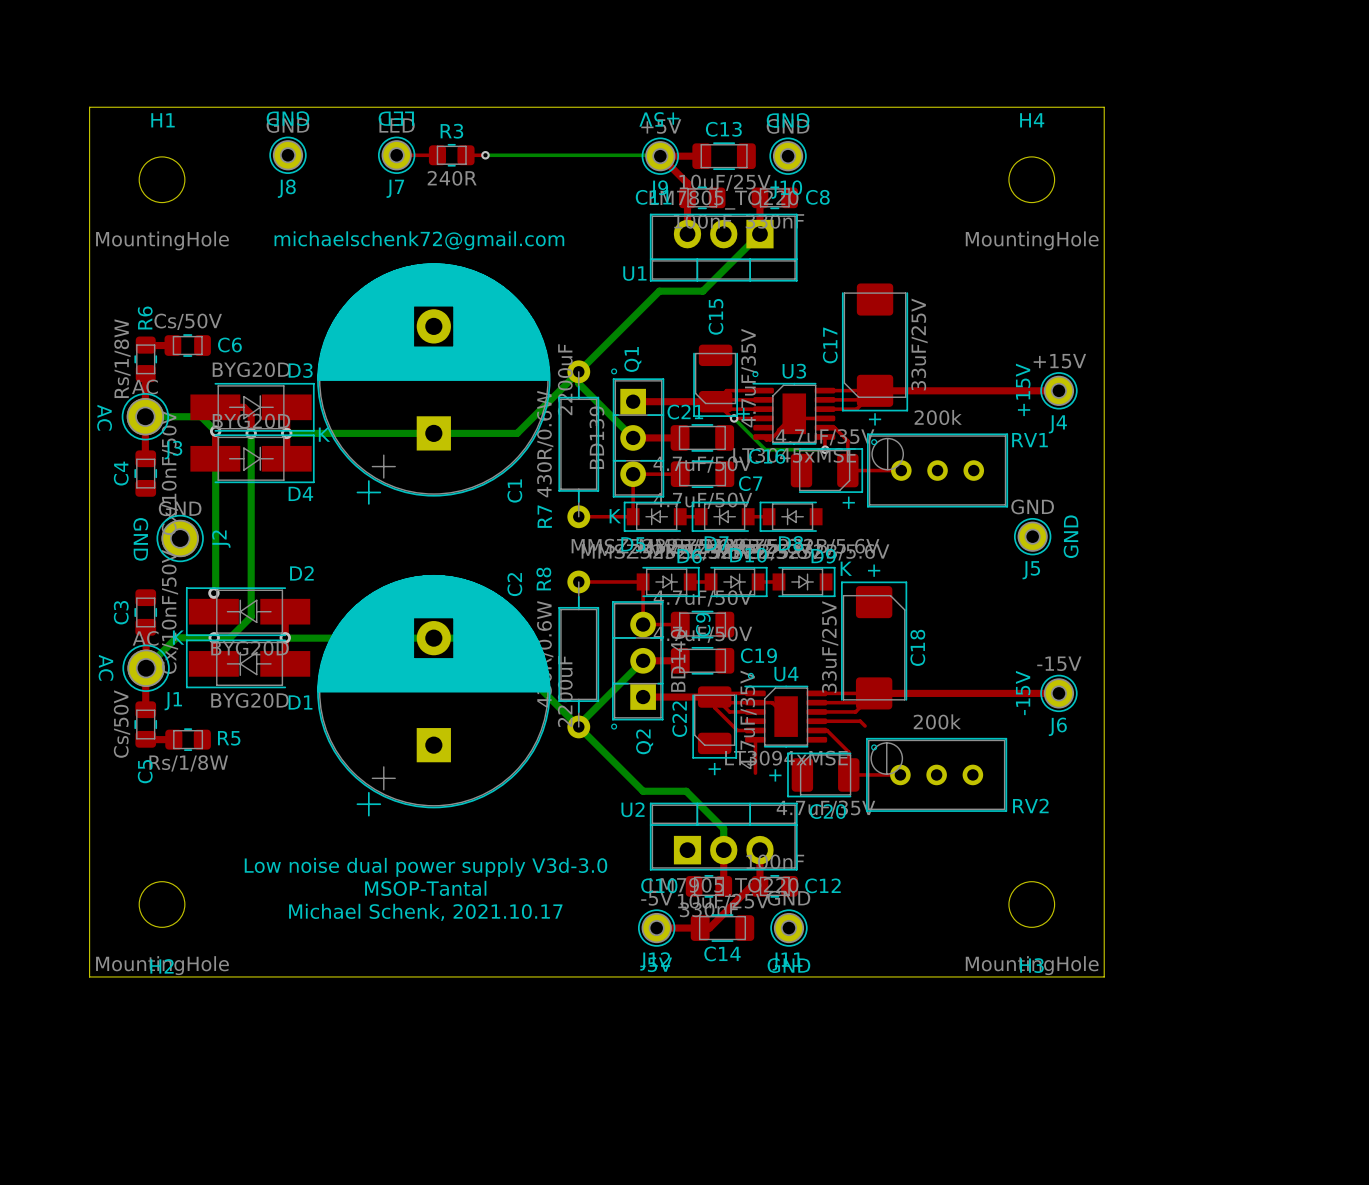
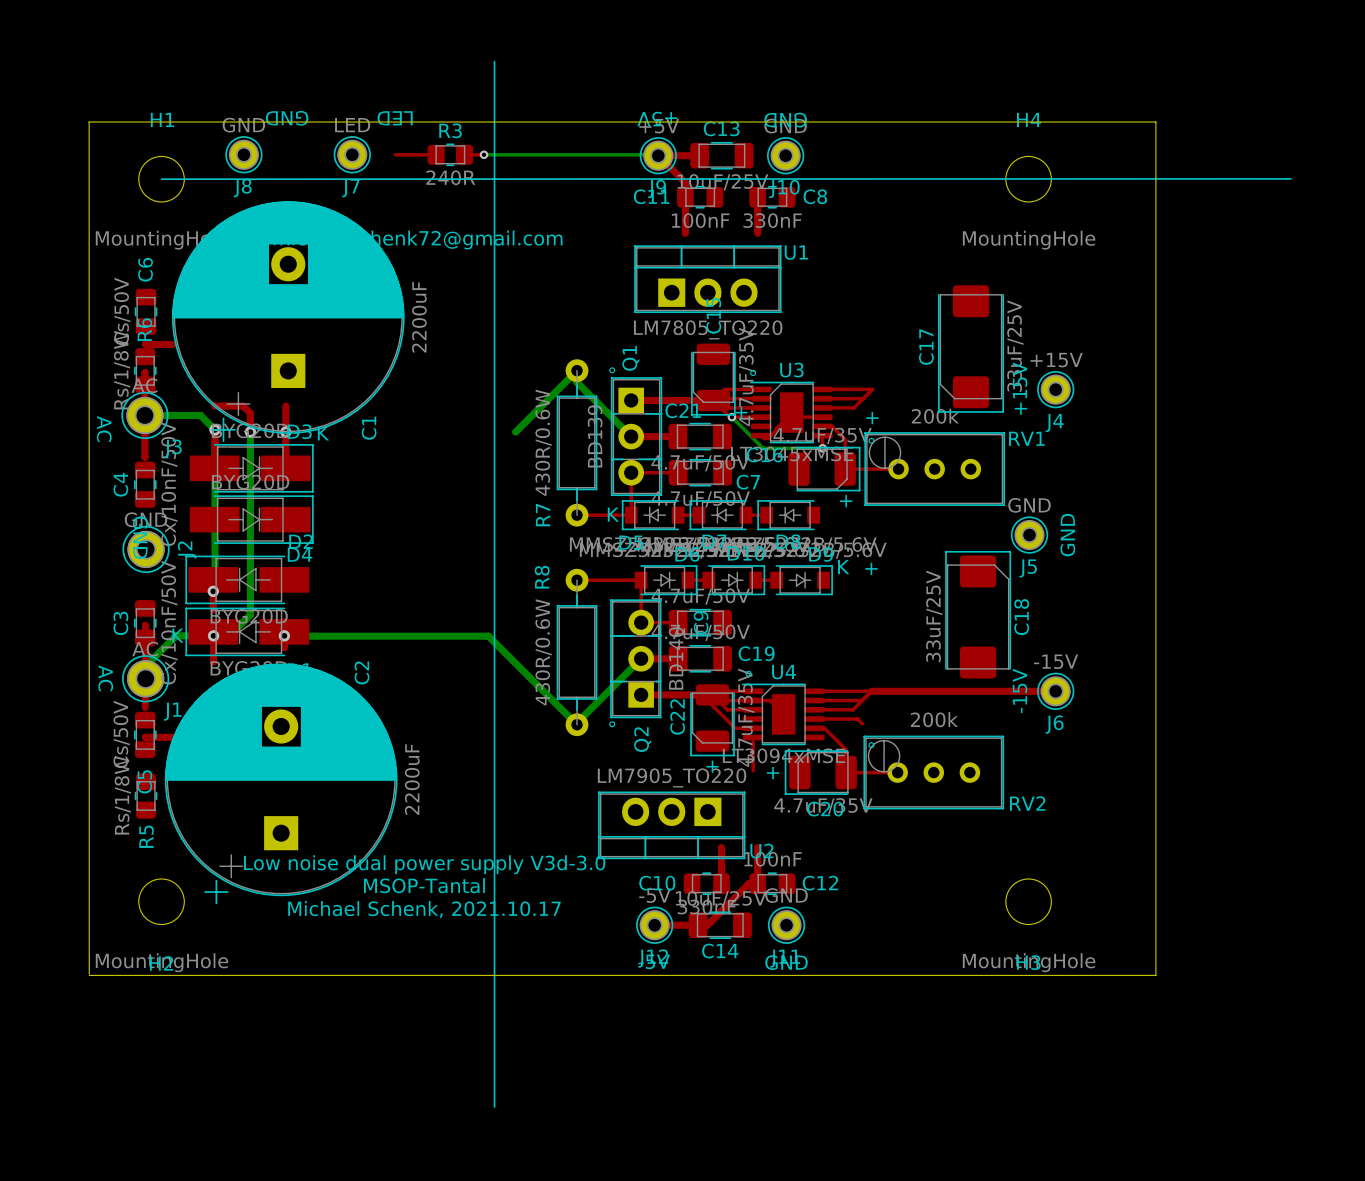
line: none -> (494, 61) (494, 1106)
board edge: (89, 107) (89, 976) (1104, 976) (1104, 107) (89, 107) -> none
J8 position: (287, 155) -> (243, 154)
J7 position: (396, 155) -> (352, 154)
line: none -> (1291, 178) (161, 179)
bottom track: (759, 234) (702, 291) (659, 291) (578, 371) -> none
U1 rotation: 0° (723, 247) -> 180° (707, 279)
C6 value position: Cs/50V (188, 321) -> Cs/50V (122, 311)
C6 rotation: 0° (187, 345) -> 90° clockwise (146, 311)
C6 position: (187, 345) -> (146, 311)
C6 name position: C6 (229, 345) -> C6 (145, 269)
C17 position: (875, 347) -> (971, 349)
R6 position: (145, 359) -> (145, 370)
C1 position: (433, 383) -> (288, 321)
top track: (875, 390) (1058, 390) -> none
D3 position: (252, 407) -> (251, 468)
text position: AC (104, 417) -> AC (104, 429)
bottom track: (286, 433) (517, 433) -> none
D4 position: (252, 458) -> (251, 519)
C4 position: (145, 473) -> (145, 484)
J2 position: (180, 538) -> (146, 549)
D2 position: (248, 611) -> (247, 579)
C3 position: (145, 612) -> (145, 623)
C18 position: (874, 645) -> (978, 614)
D1 position: (248, 663) -> (247, 631)
text position: AC (106, 667) -> AC (105, 678)
J1 position: (146, 668) -> (145, 678)
C2 position: (433, 695) -> (281, 783)
C5 position: (145, 724) -> (145, 734)
bottom track: (578, 726) (643, 791) (686, 791) (723, 828) (723, 850) -> none
R5 rotation: 0° (188, 739) -> 90° clockwise (146, 795)
R5 position: (188, 739) -> (146, 795)
U2 rotation: 0° (723, 836) -> 180° (671, 825)
board edge: none -> (89, 974) (89, 122) (1155, 122) (1155, 975) (89, 975)

